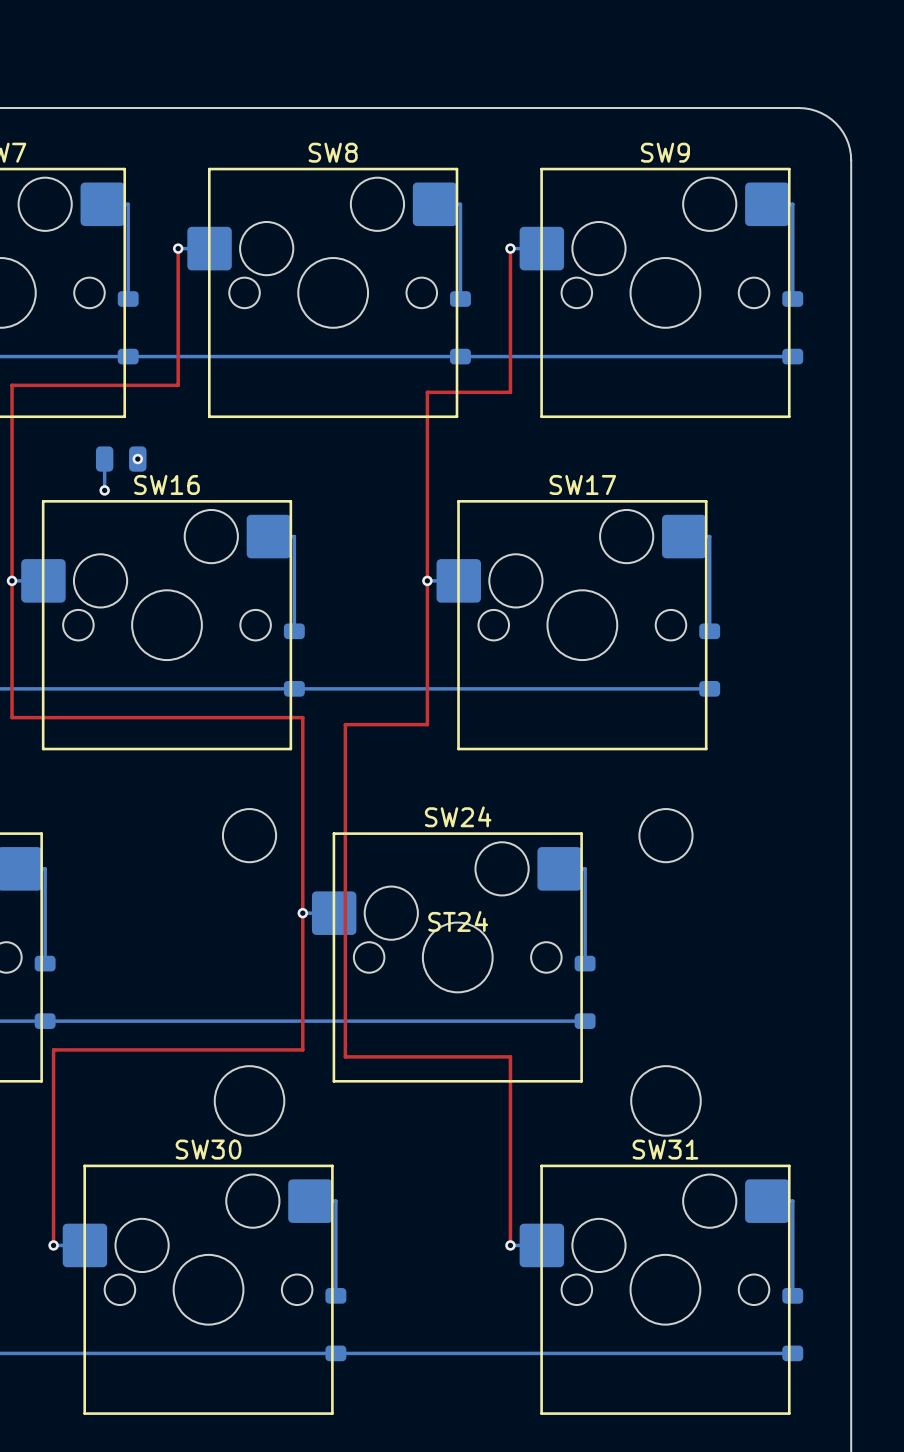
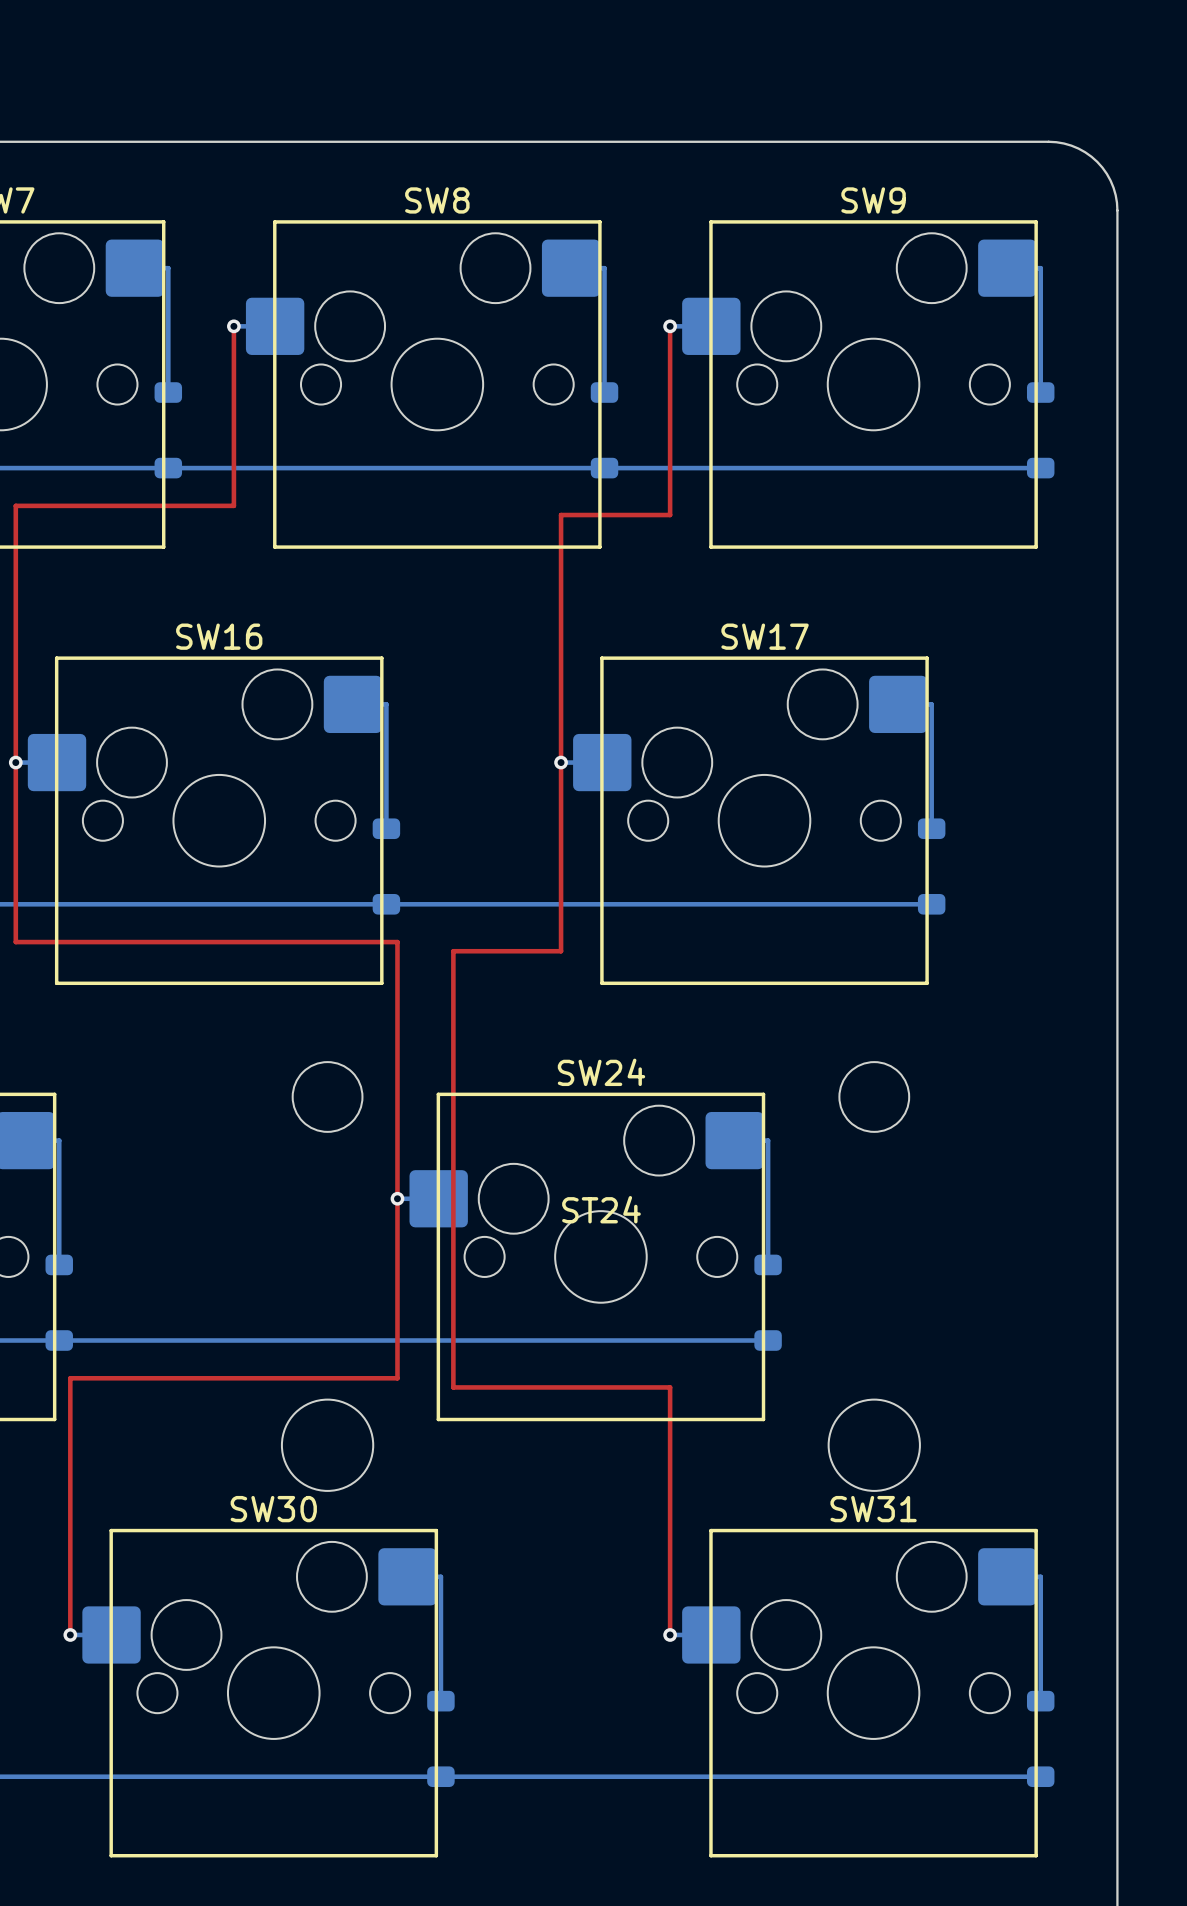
bottom track: (104, 459) (104, 490) -> none
part: (121, 459) -> none
via: (137, 459) -> none
via: (104, 490) -> none

